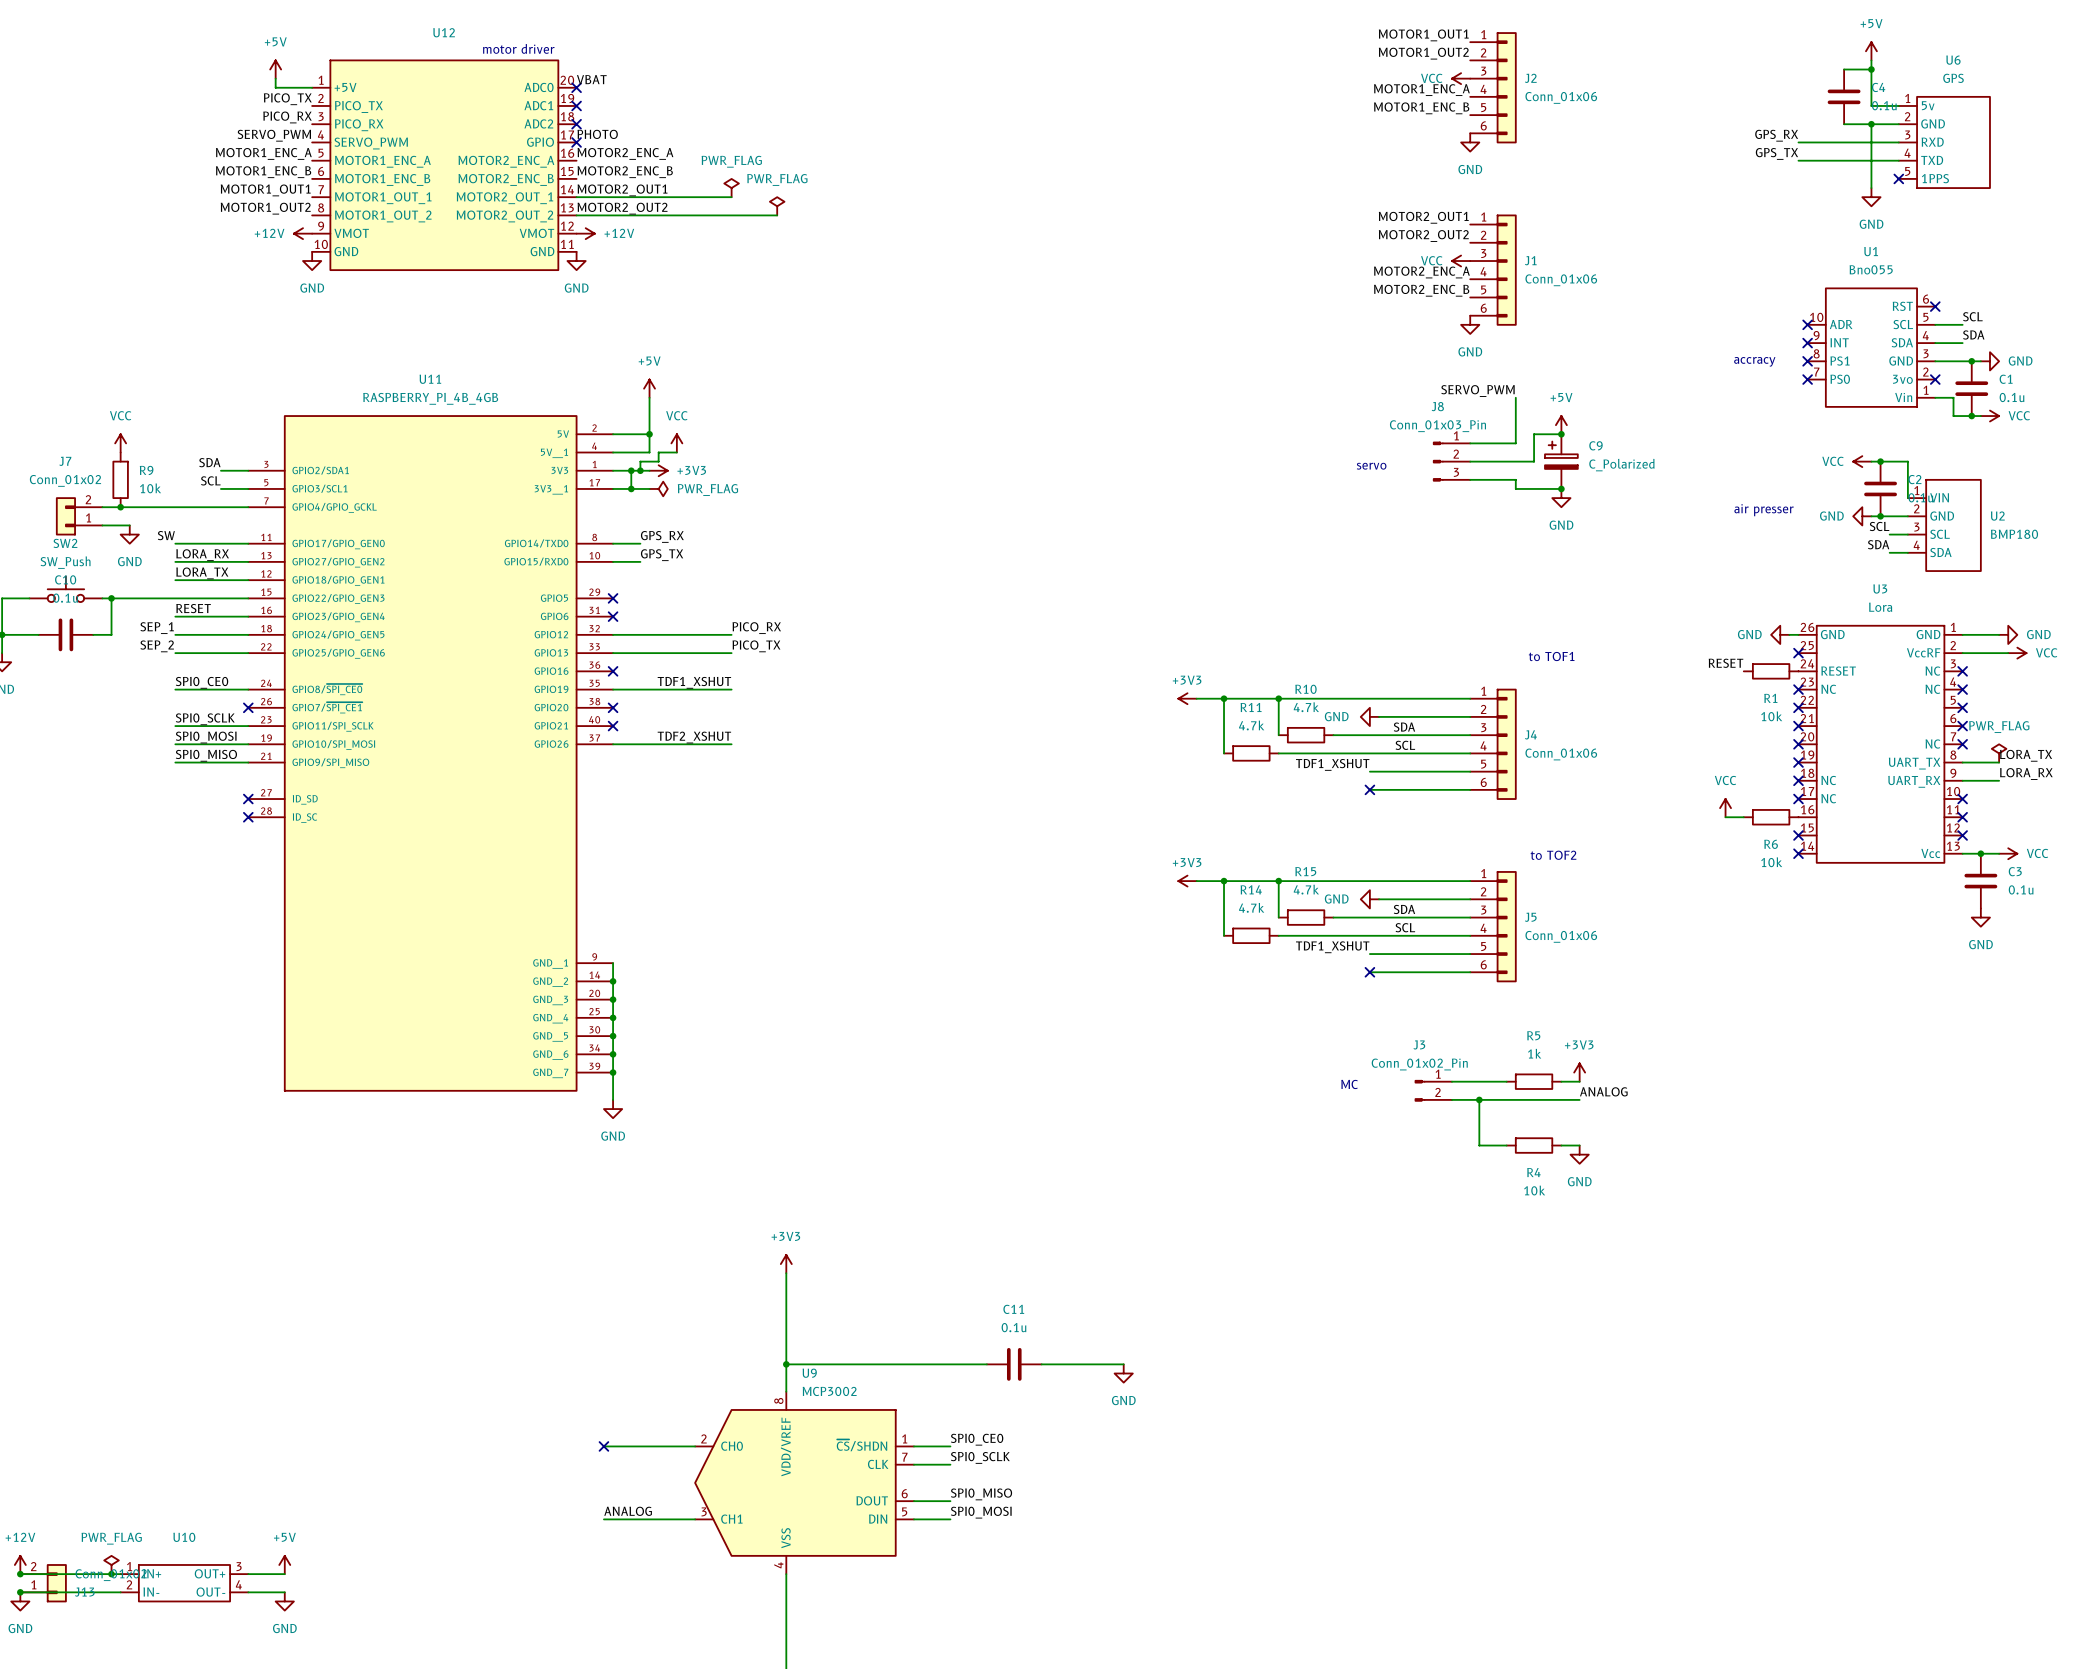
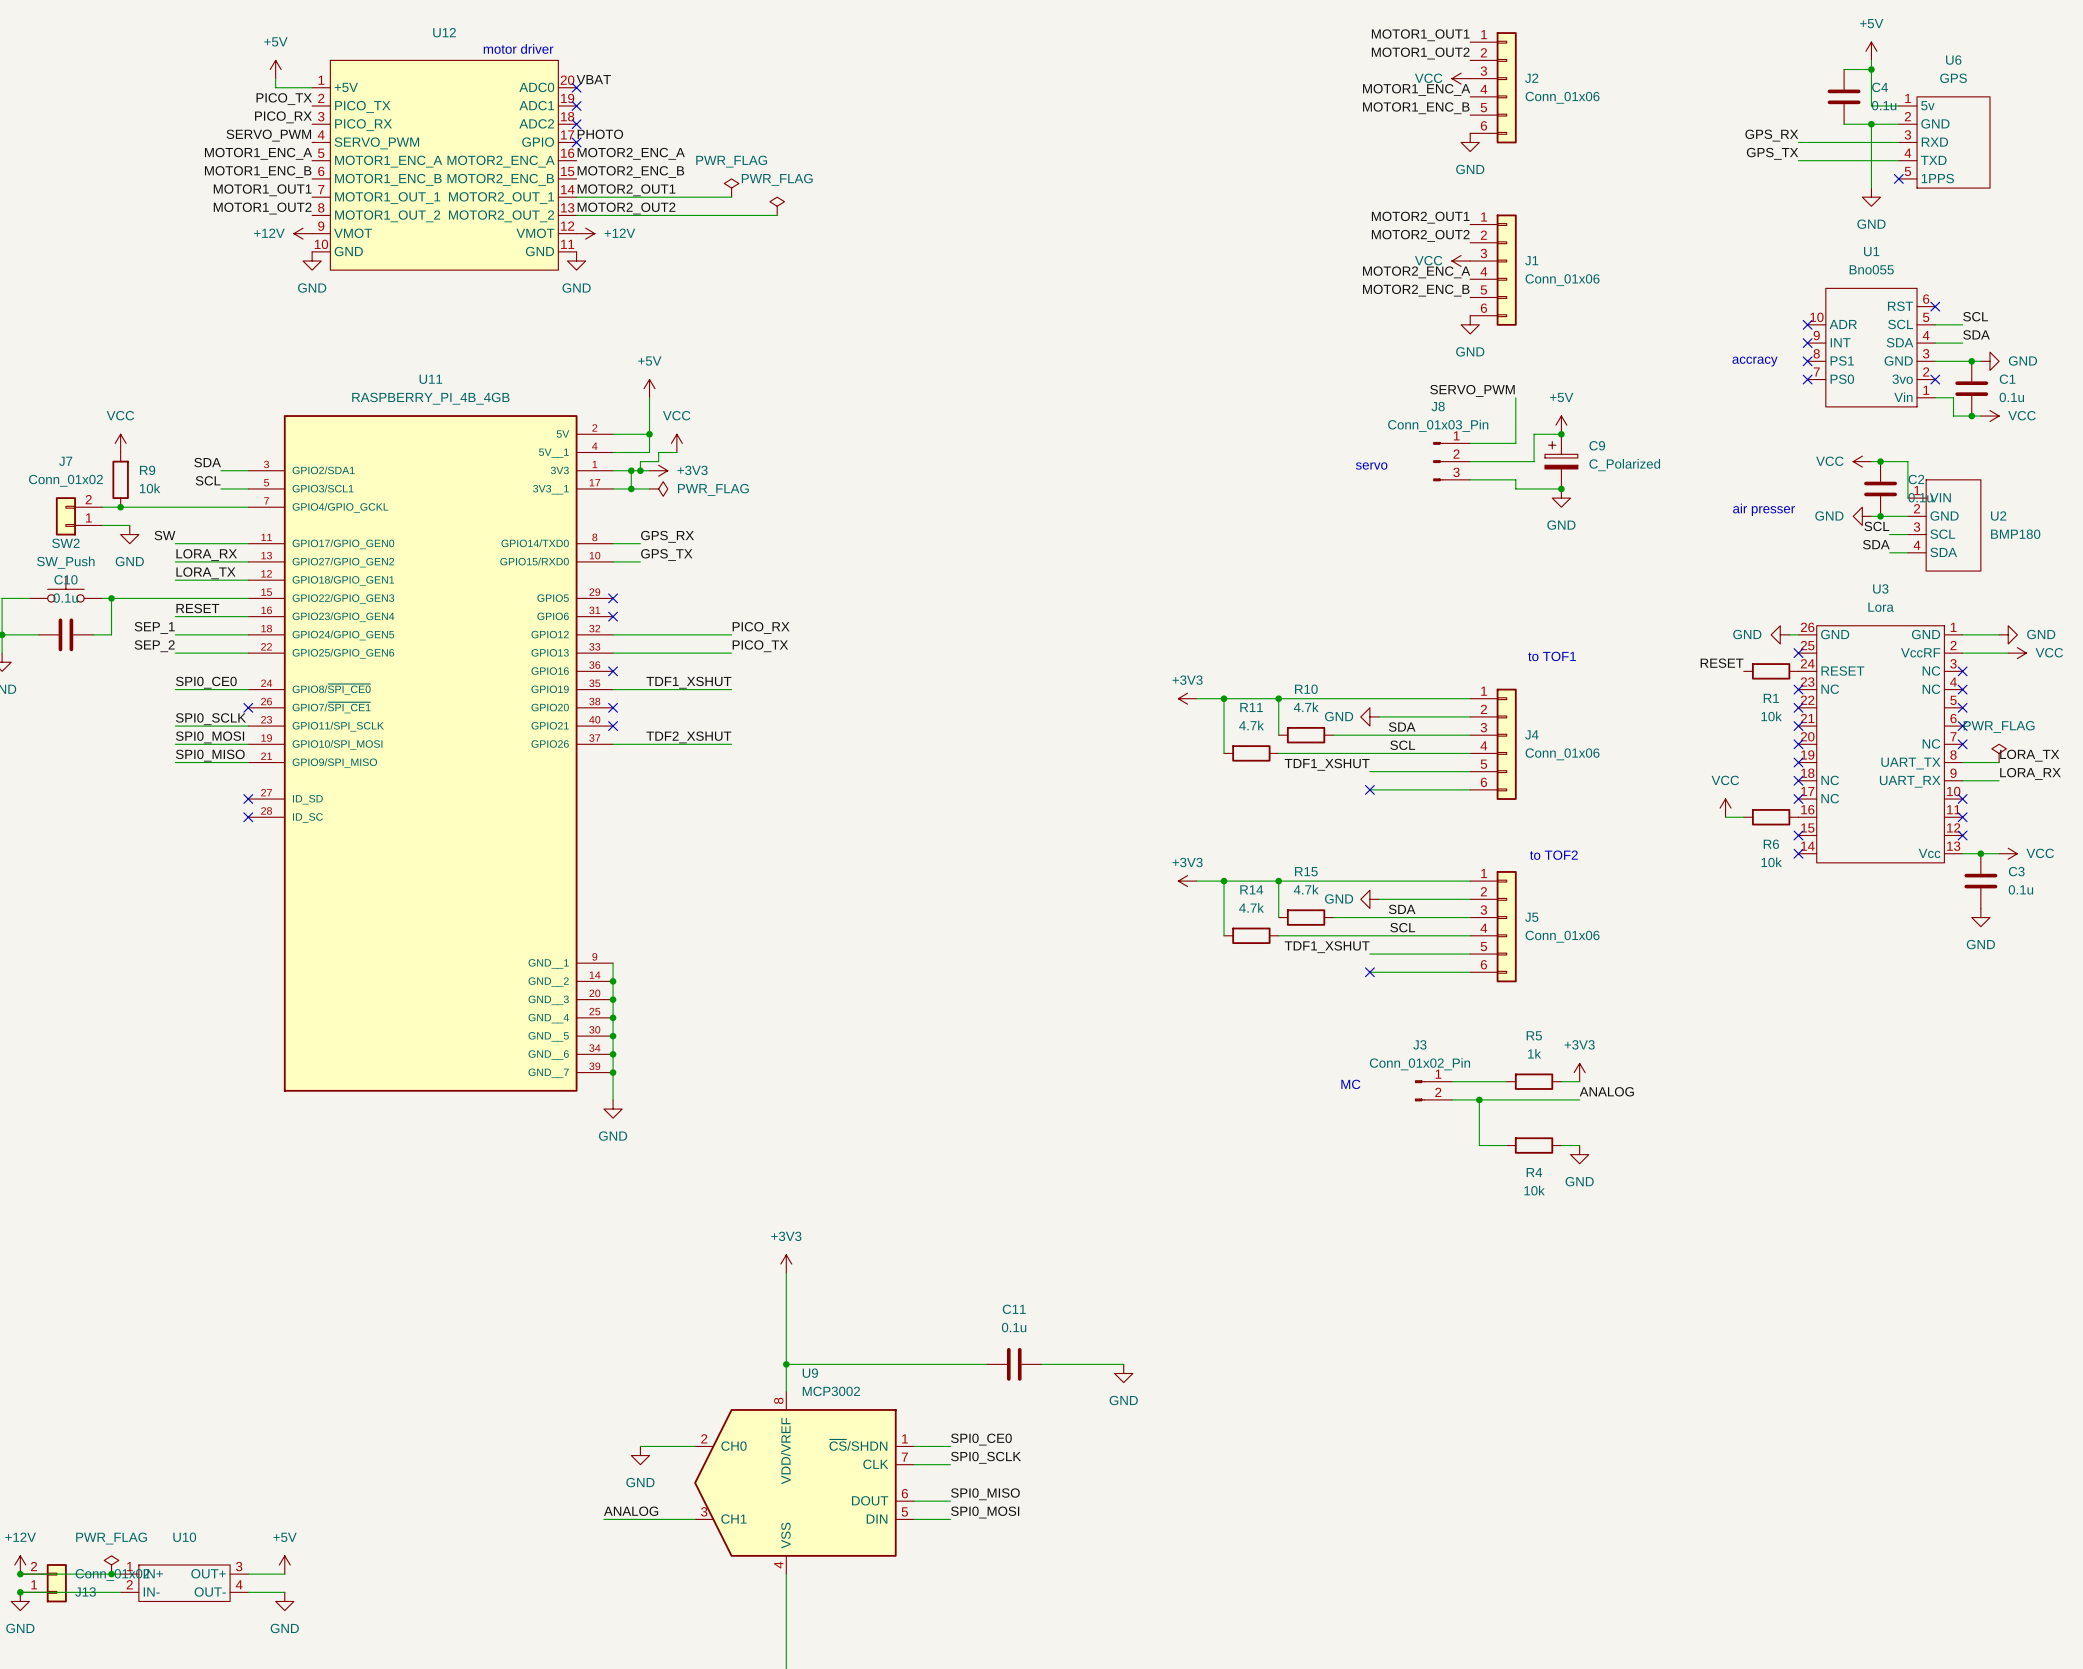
wire: (603, 1446) (640, 1446) -> none
no-connect mark: (603, 1446) -> none
power symbol: none -> GND (640, 1455)

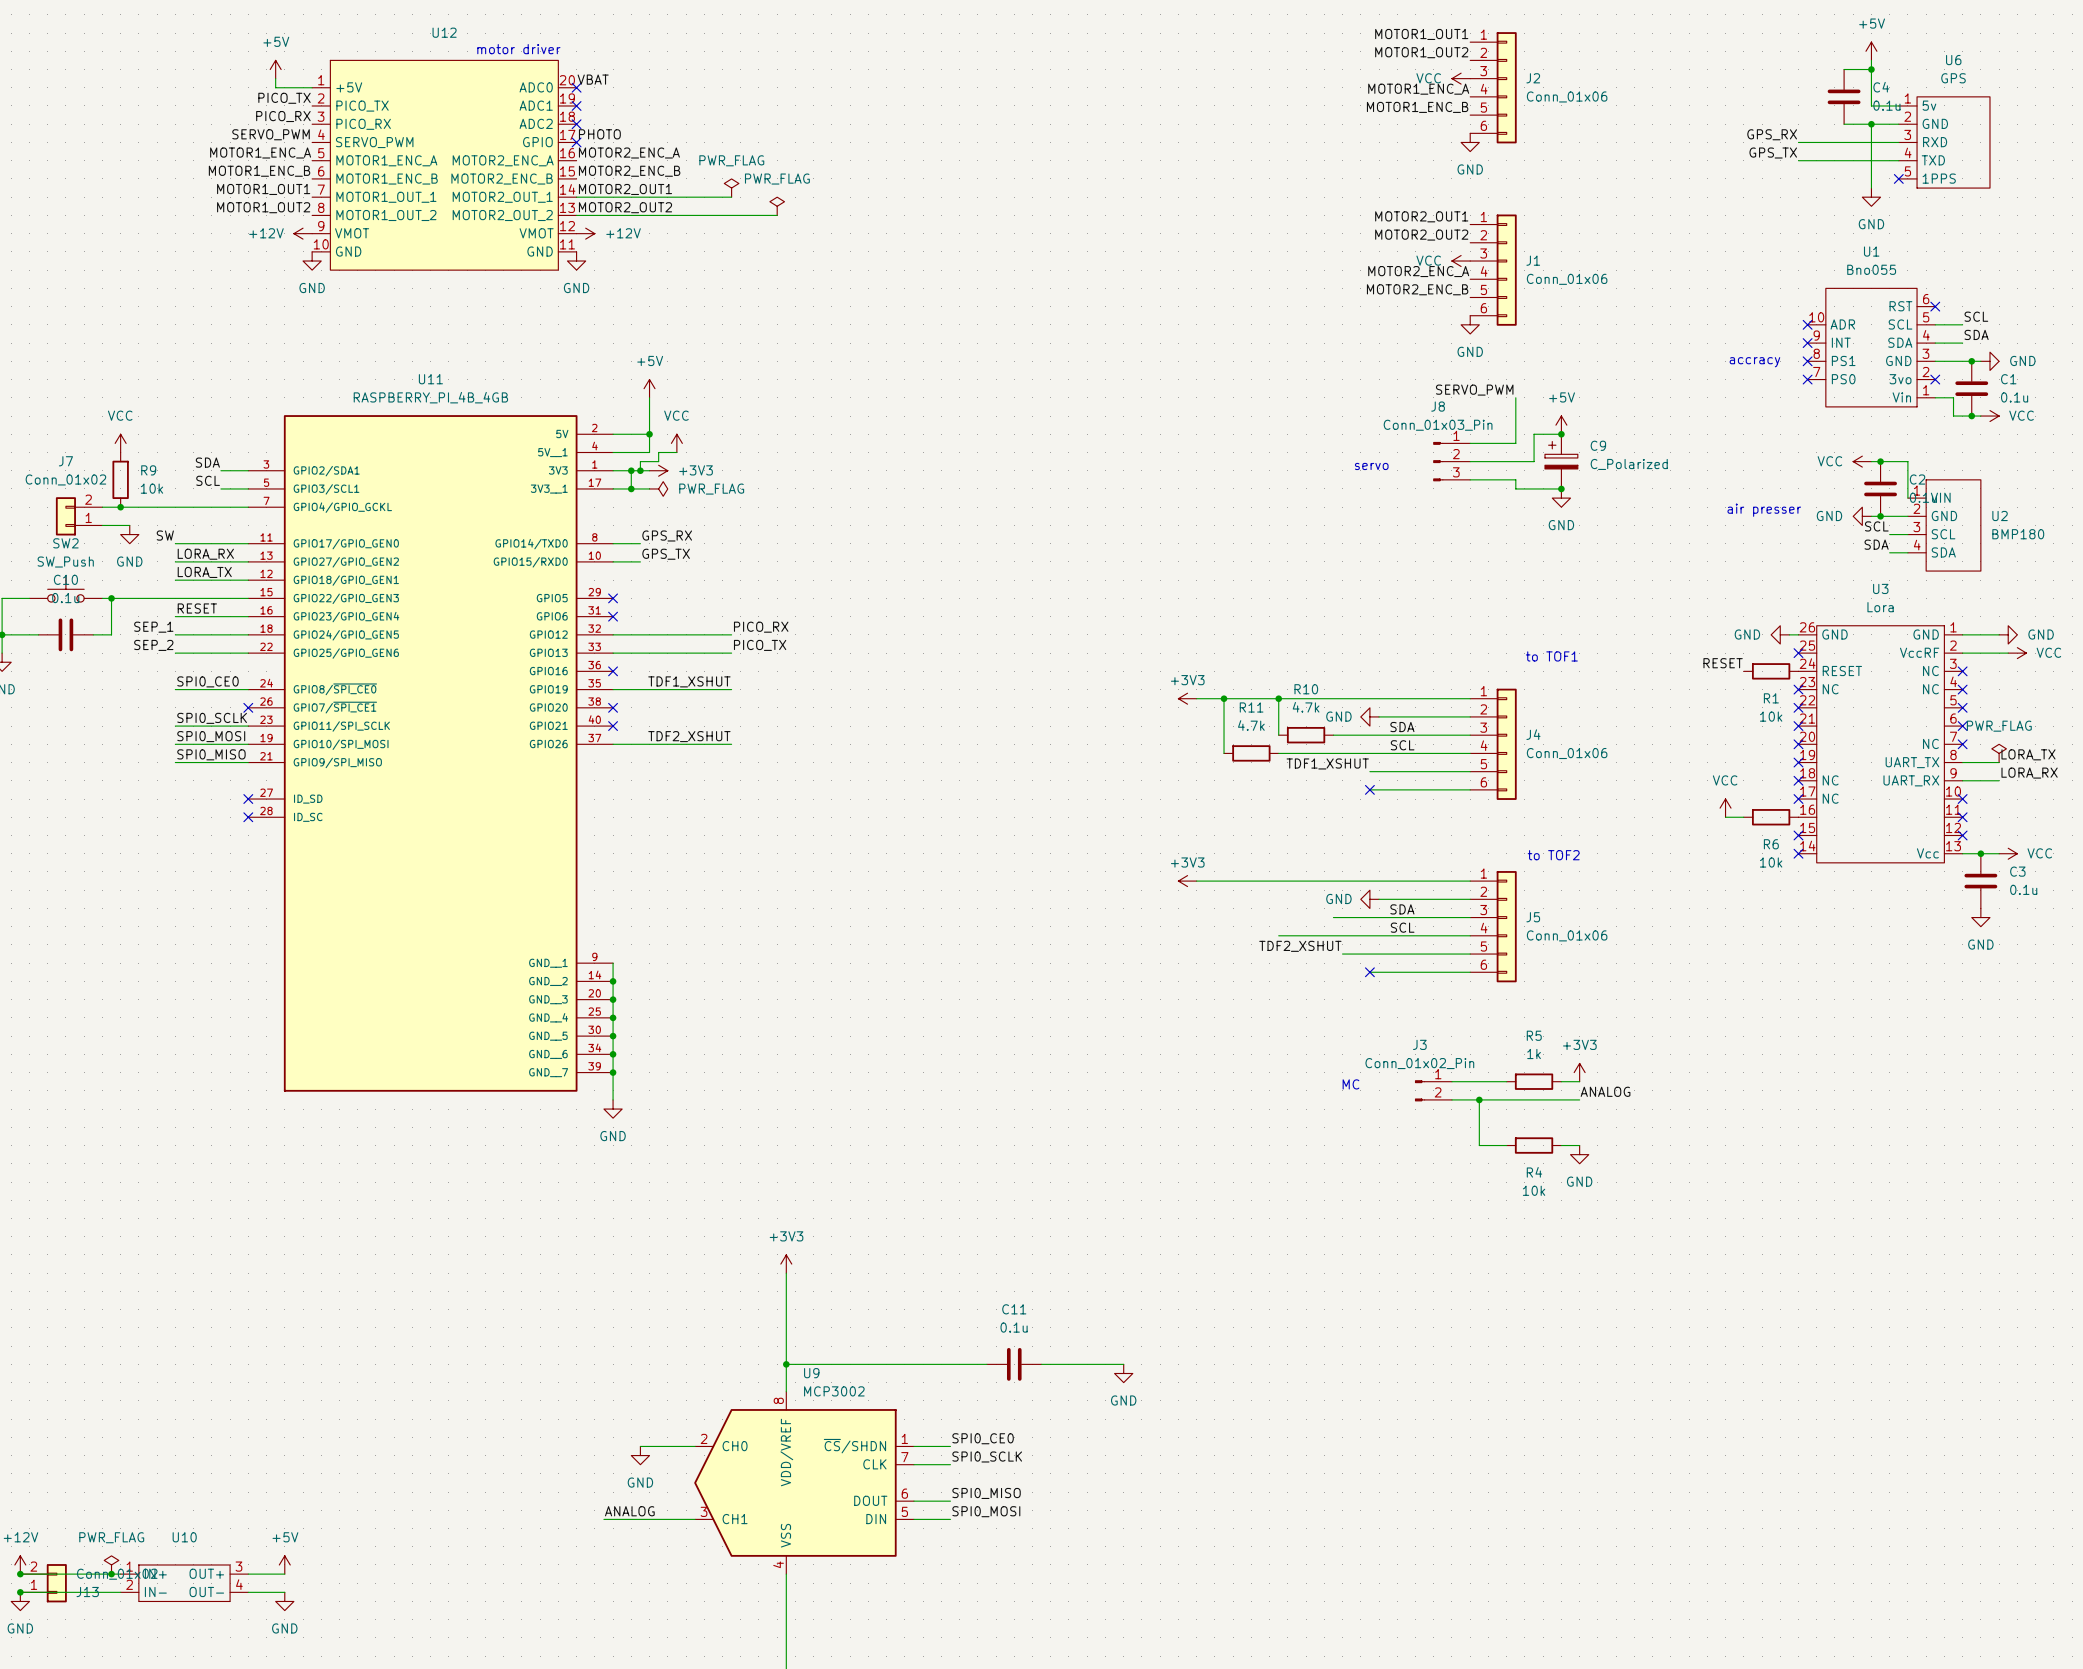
wire: (1224, 881) (1224, 935) -> none
junction: (1224, 881) -> none
wire: (1278, 881) (1278, 917) -> none
junction: (1278, 881) -> none
R15: 4.7k (1306, 917) -> none
R14: 4.7k (1251, 935) -> none
label: TDF1_XSHUT (1327, 947) -> TDF2_XSHUT (1300, 946)
wire: none -> (1342, 954) (1369, 954)

